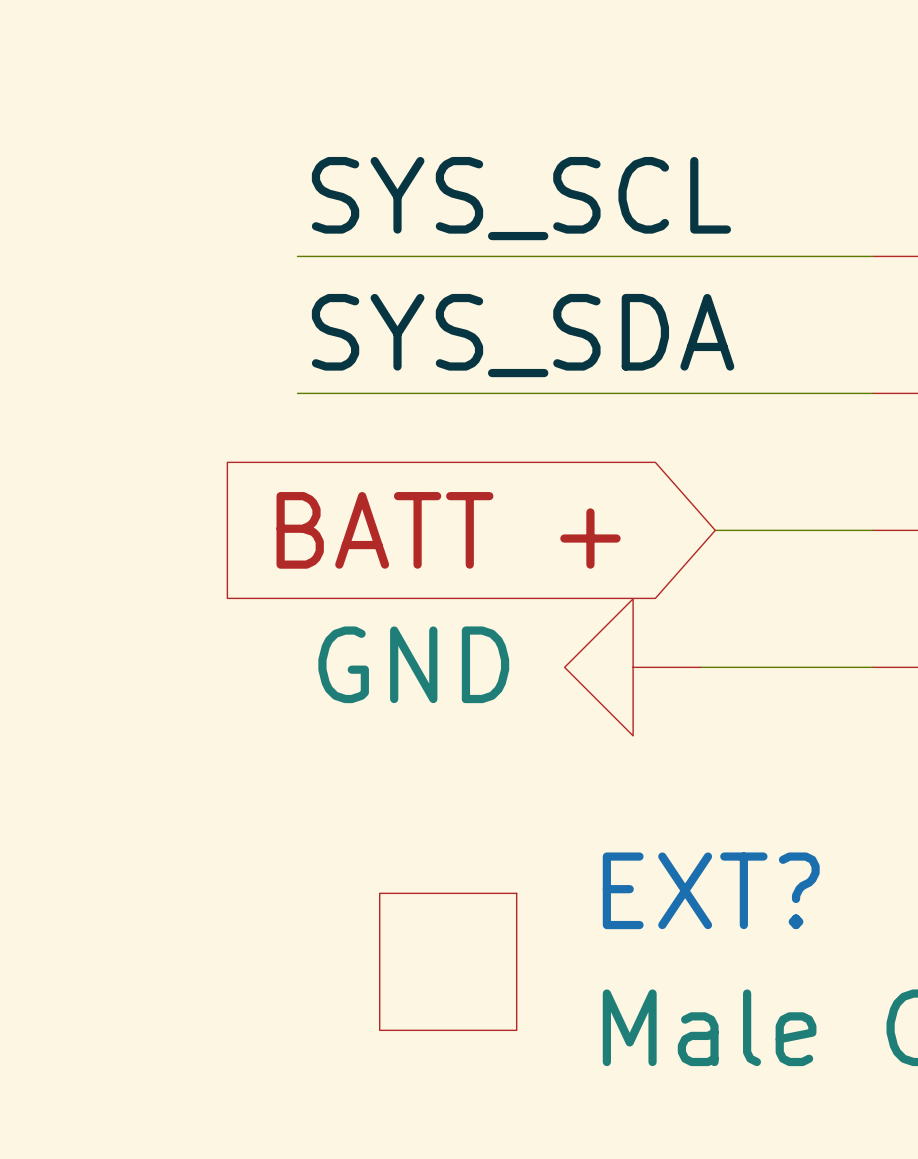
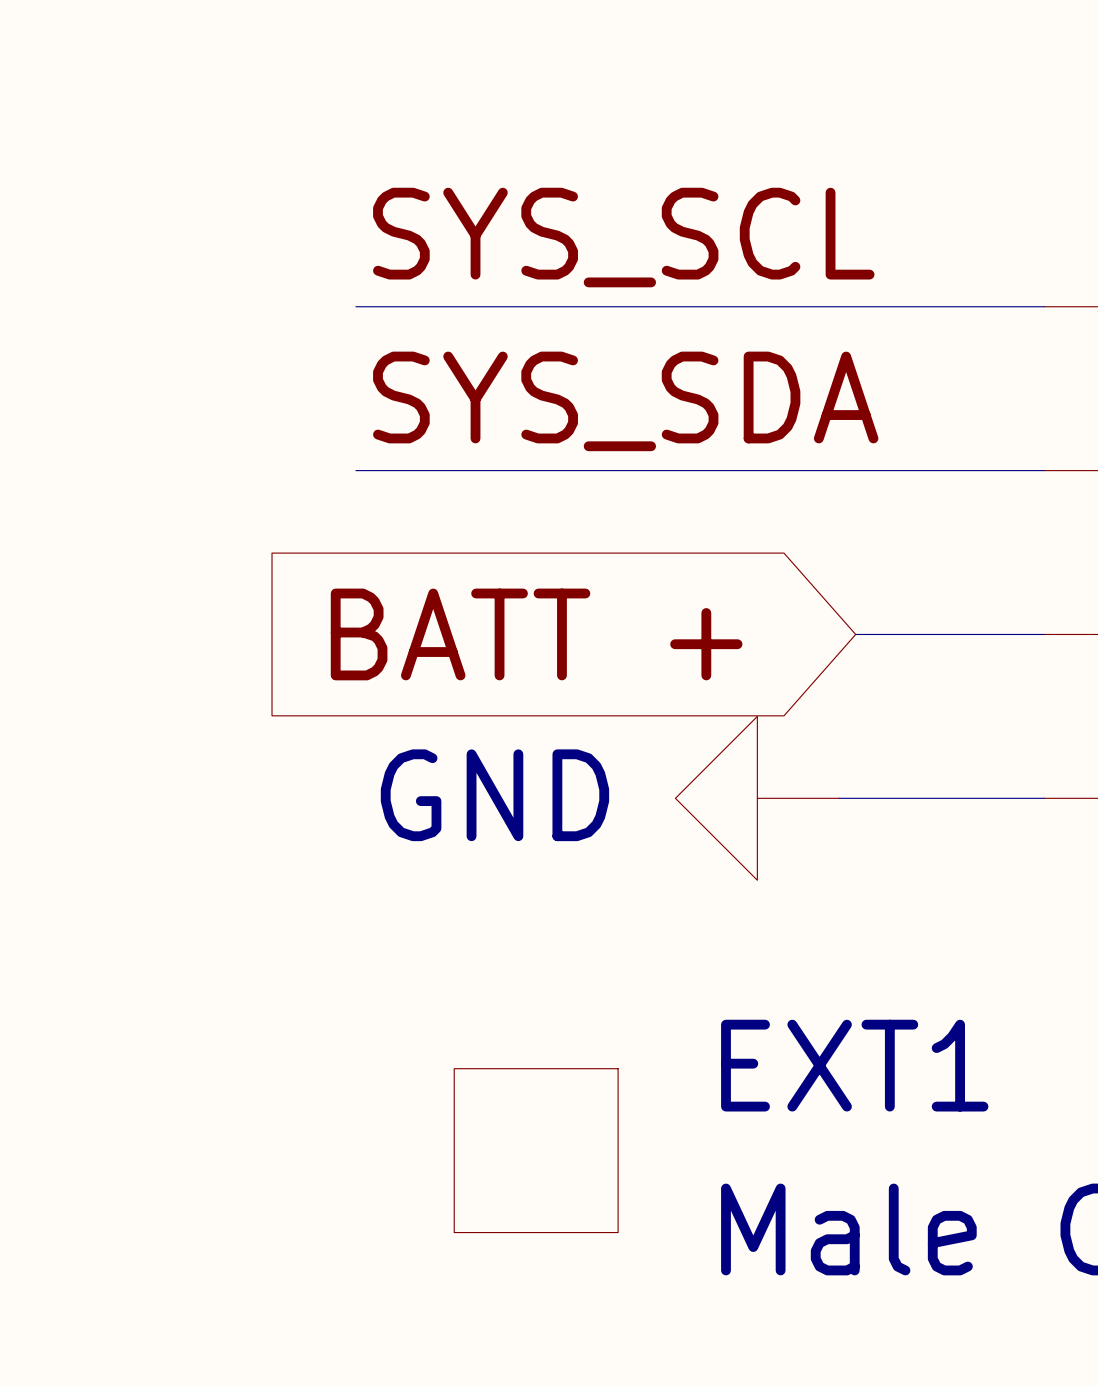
EXT? name: EXT? (711, 890) -> EXT1 (854, 1065)

